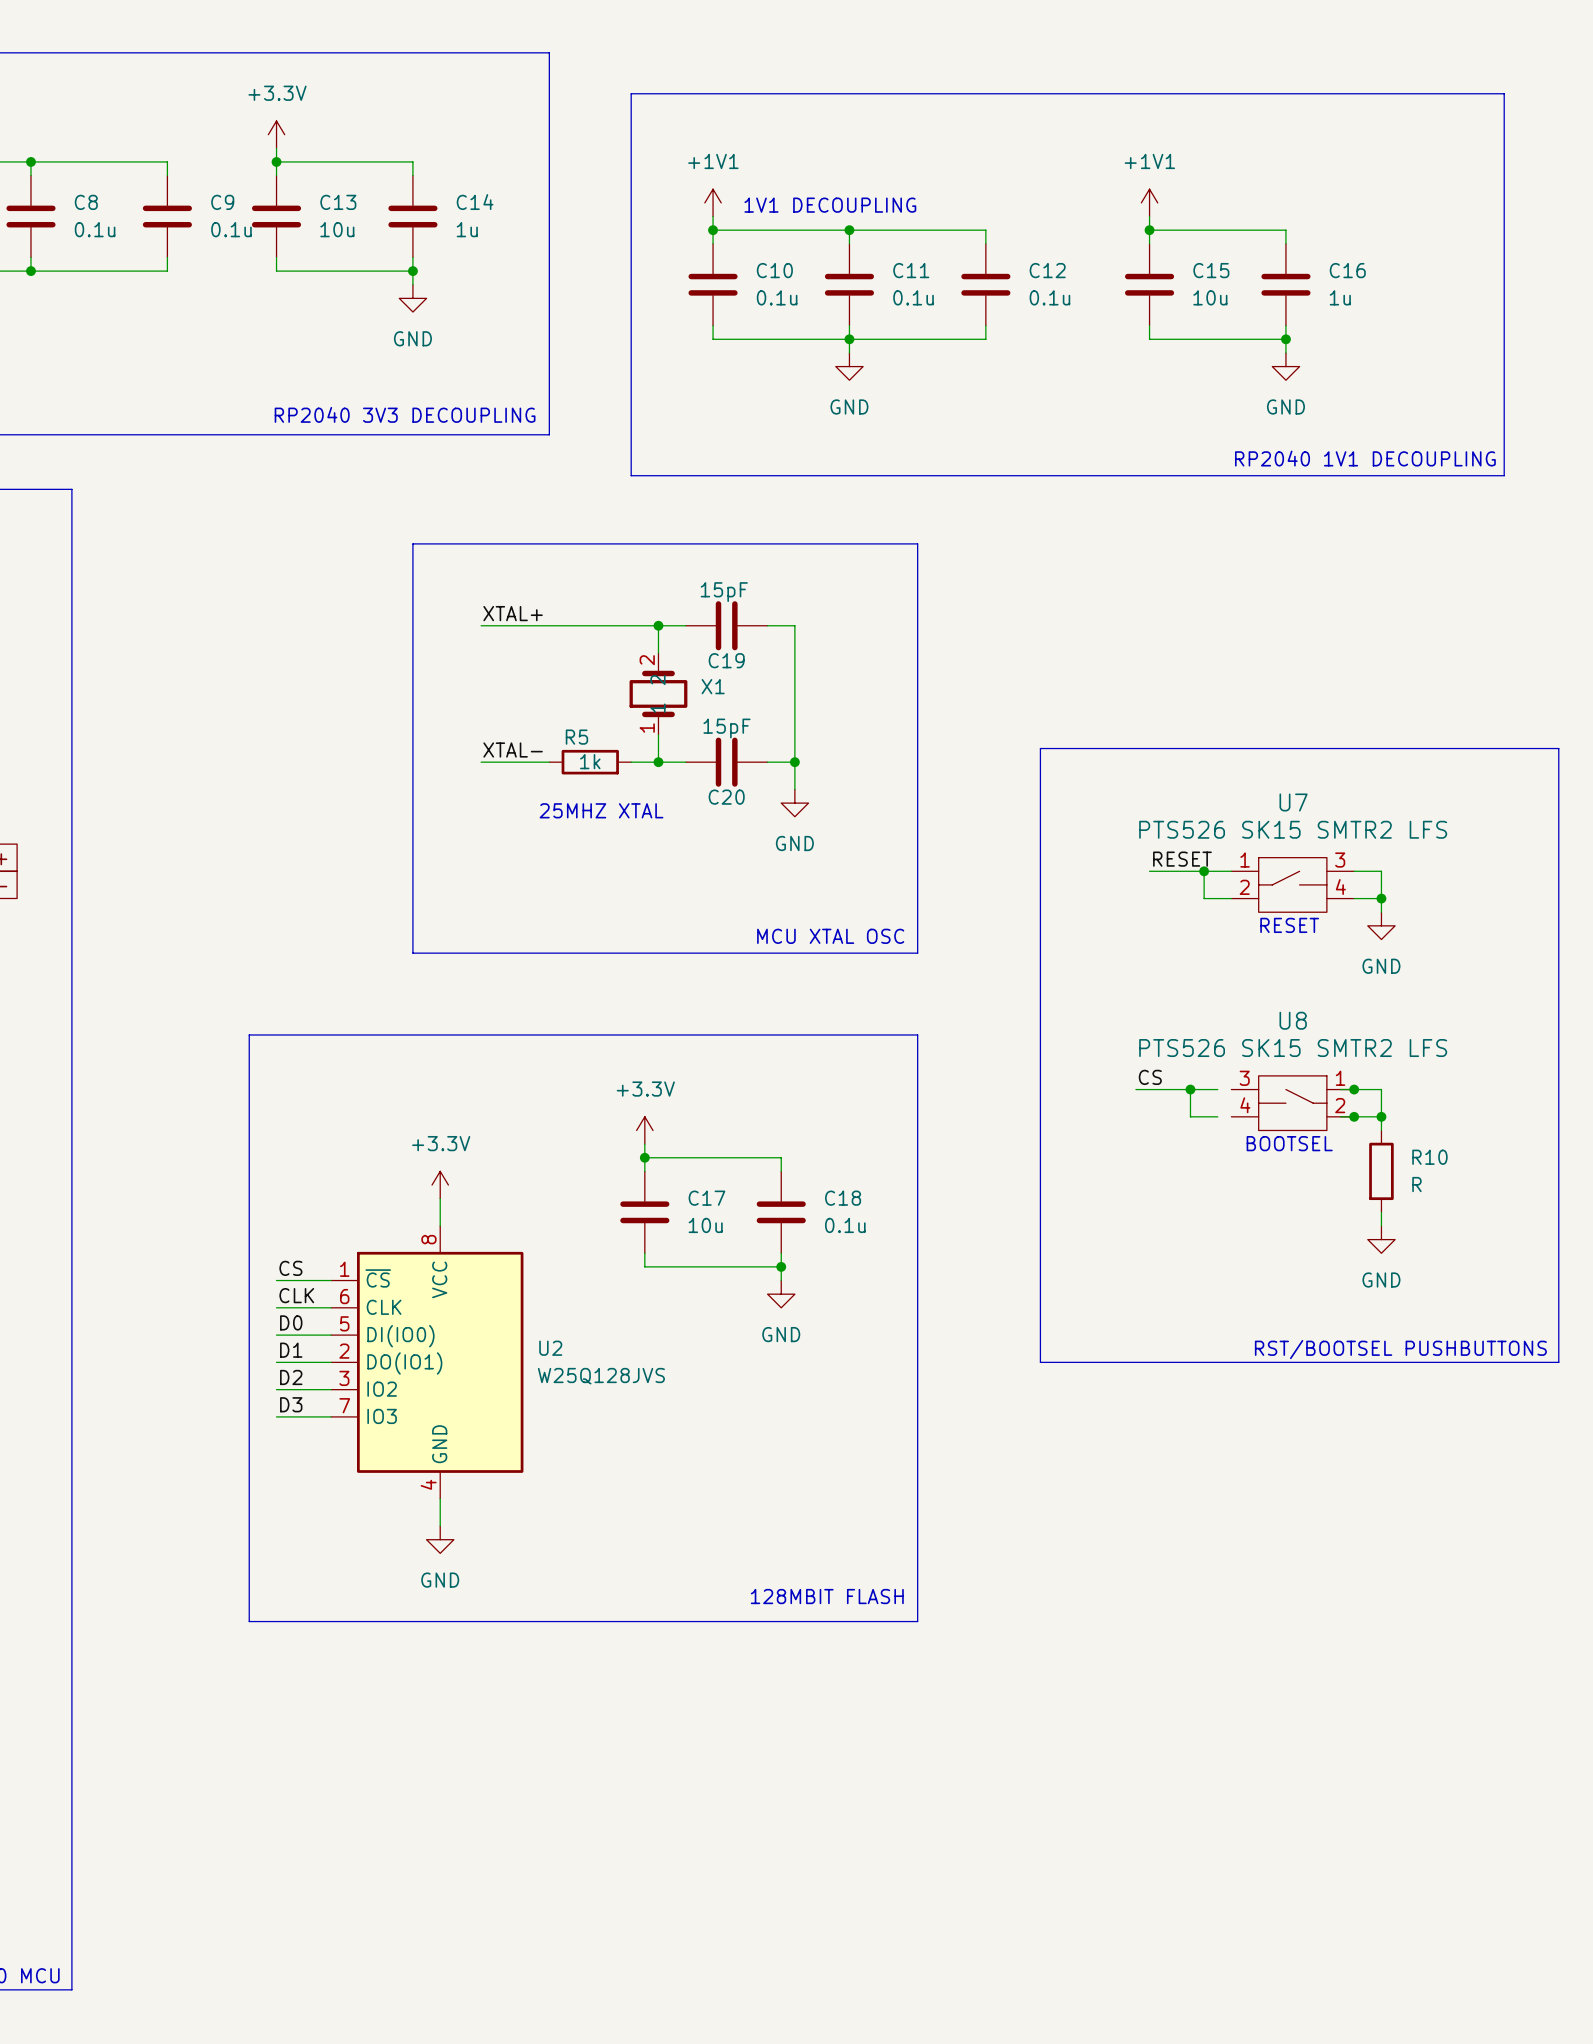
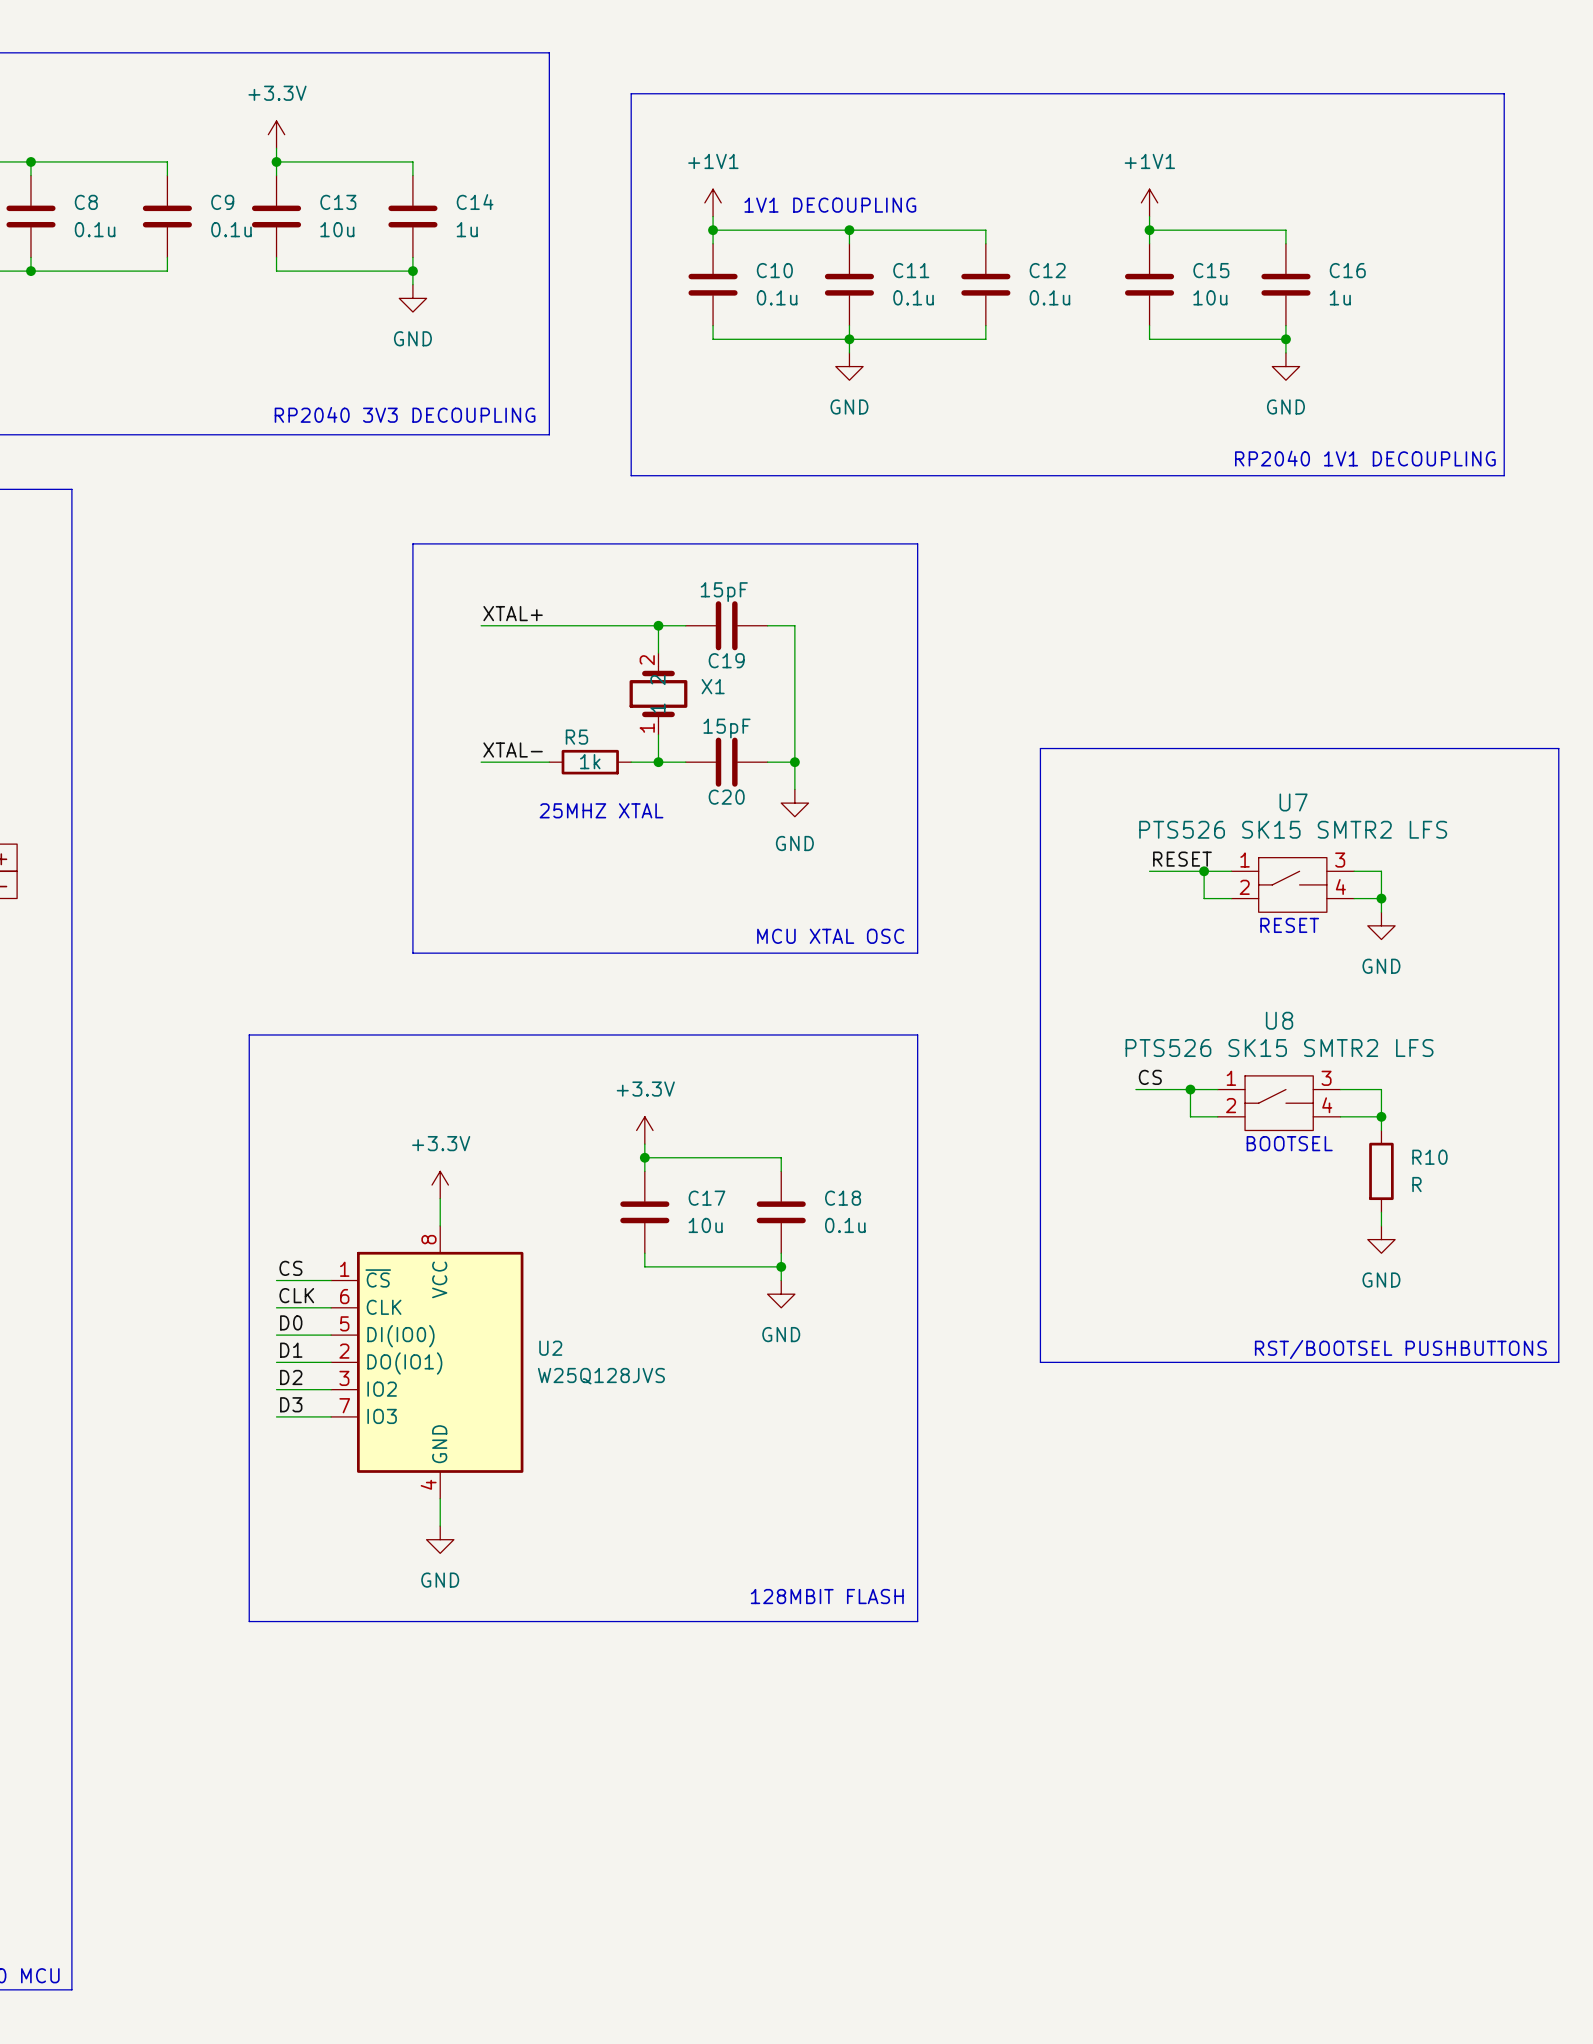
junction: (1354, 1089) -> none
U8 flip: as is (1292, 1103) -> left-right (1279, 1103)
junction: (1354, 1116) -> none

